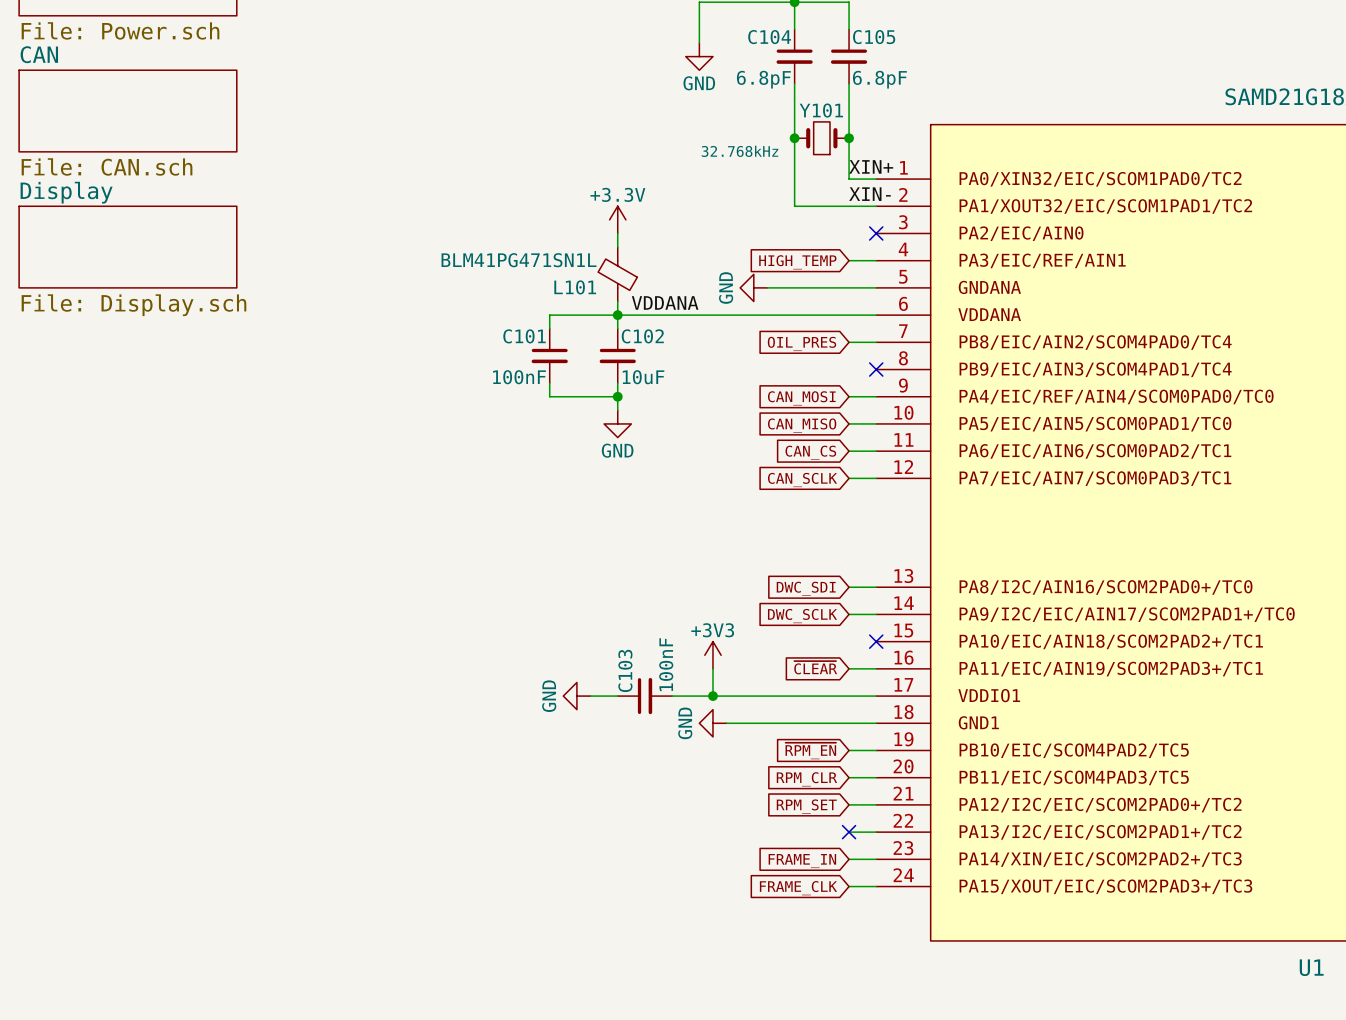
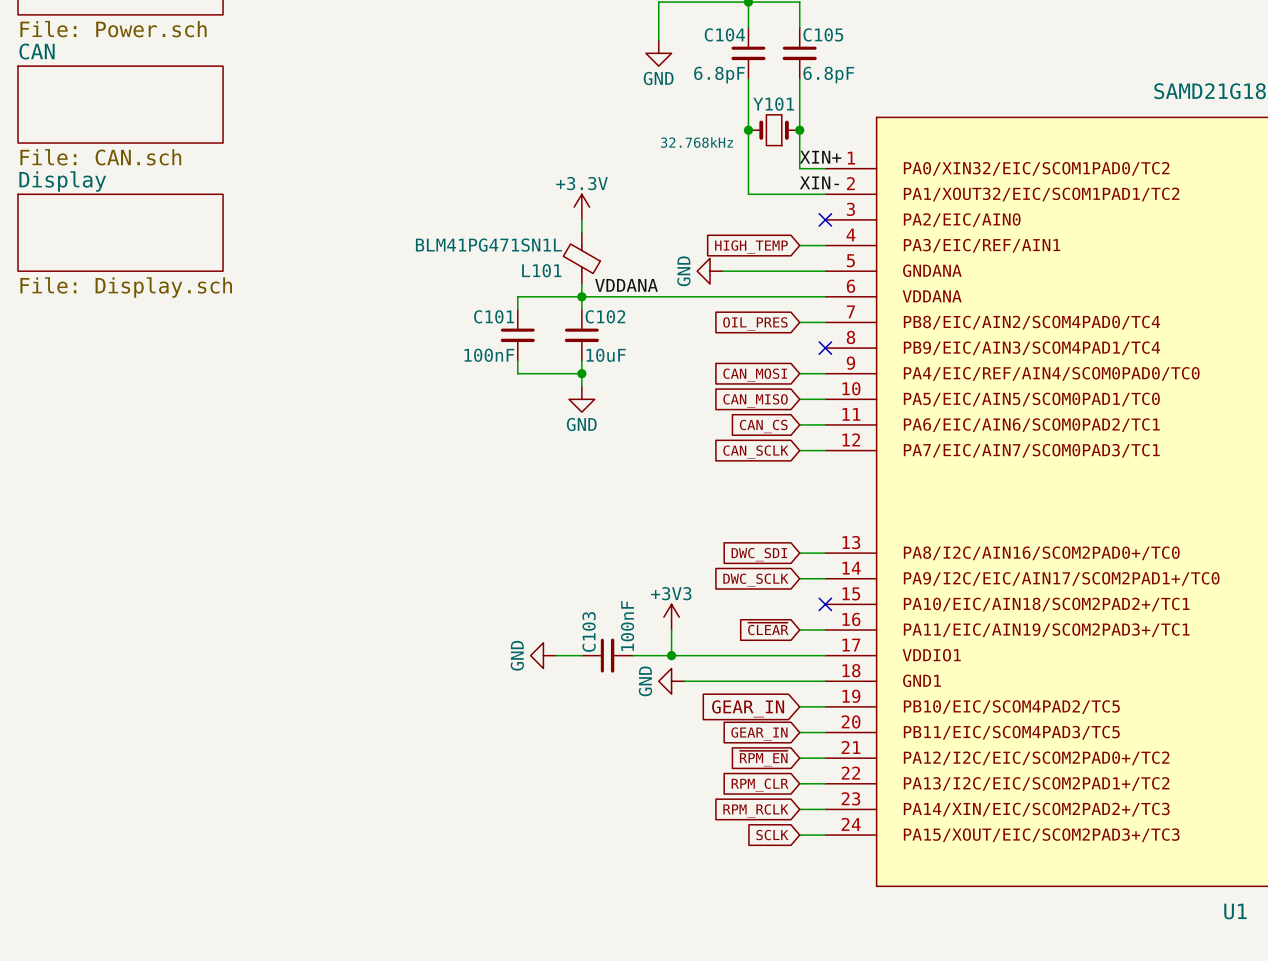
global label: ~{RPM_EN} (810, 750) -> GEAR_IN (748, 708)
global label: RPM_CLR (806, 779) -> GEAR_IN (759, 734)
global label: RPM_SET (806, 806) -> ~{RPM_EN} (763, 758)
no-connect mark: (849, 832) -> none
global label: none -> RPM_CLR (760, 785)
global label: FRAME_IN (802, 861) -> RPM_RCLK (755, 810)
global label: FRAME_CLK (798, 888) -> SCLK (772, 835)

